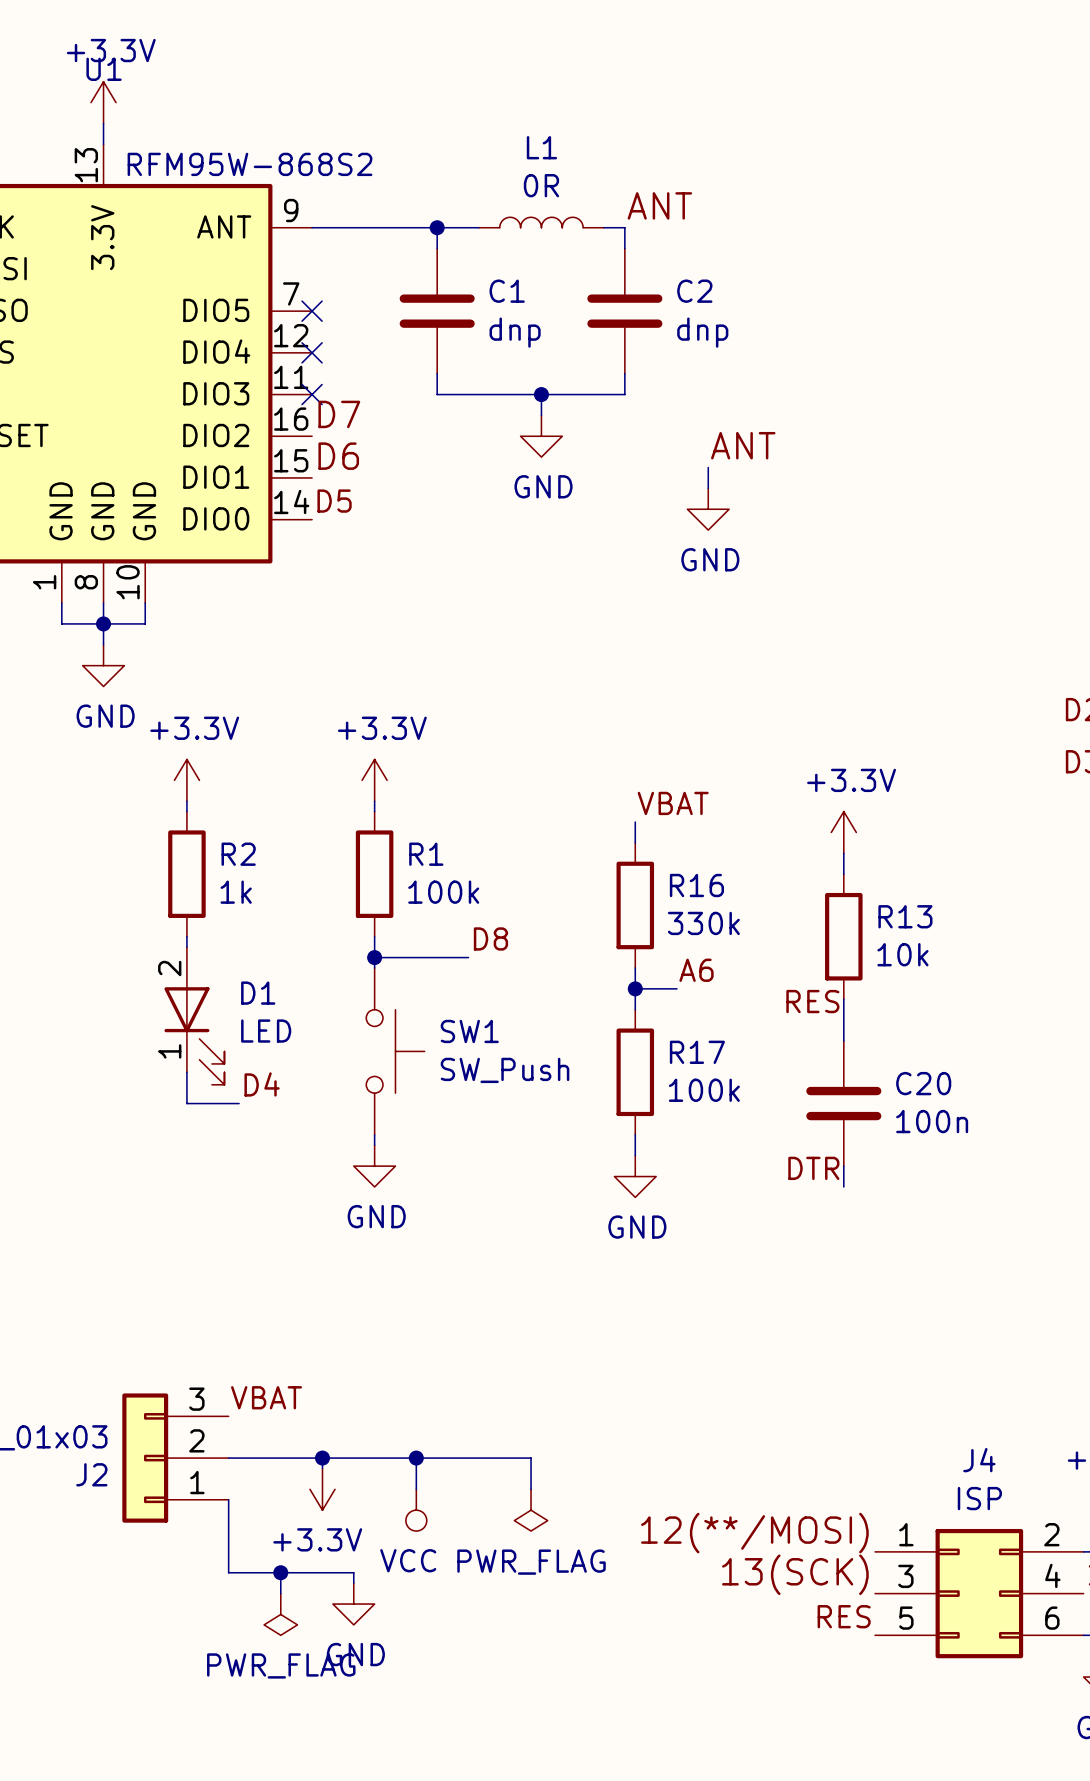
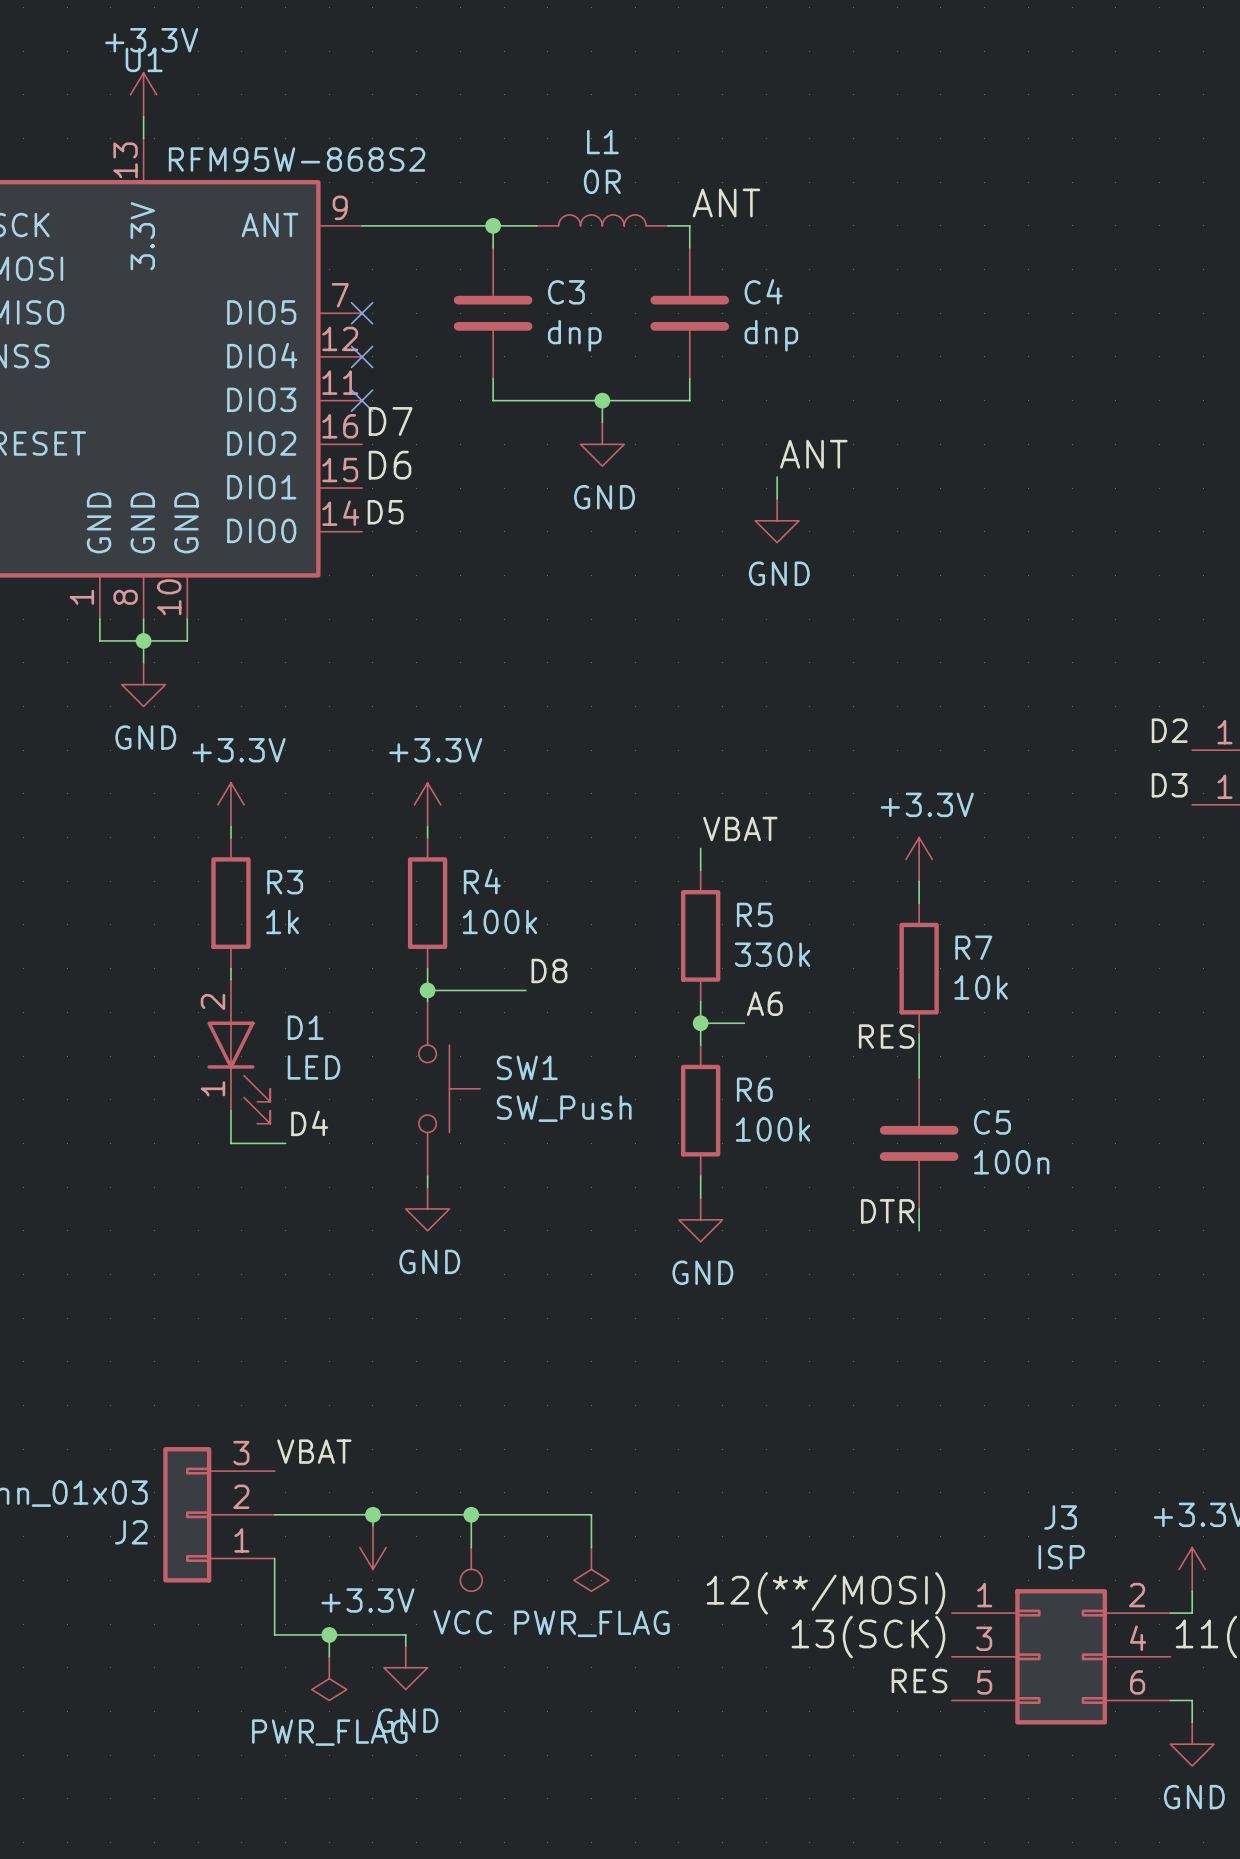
C1 name: C1 (507, 291) -> C3 (566, 292)
C2 name: C2 (694, 291) -> C4 (763, 291)
R2 name: R2 (238, 854) -> R3 (285, 882)
R1 name: R1 (426, 854) -> R4 (482, 881)
R16 name: R16 (696, 885) -> R5 (754, 914)
R13 name: R13 (905, 916) -> R7 (973, 947)
R17 name: R17 (697, 1052) -> R6 (754, 1089)
C20 name: C20 (923, 1083) -> C5 (992, 1122)
J4 name: J4 (979, 1460) -> J3 (1060, 1517)

